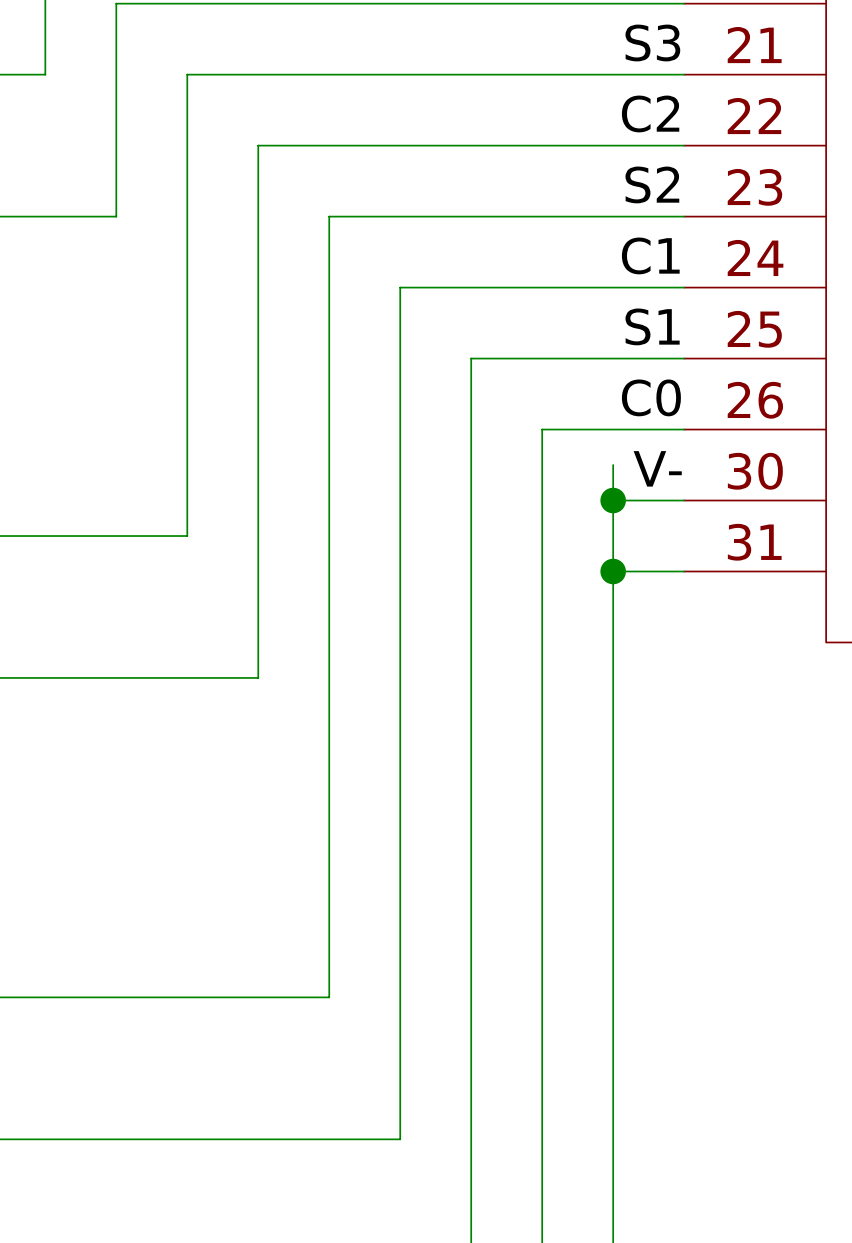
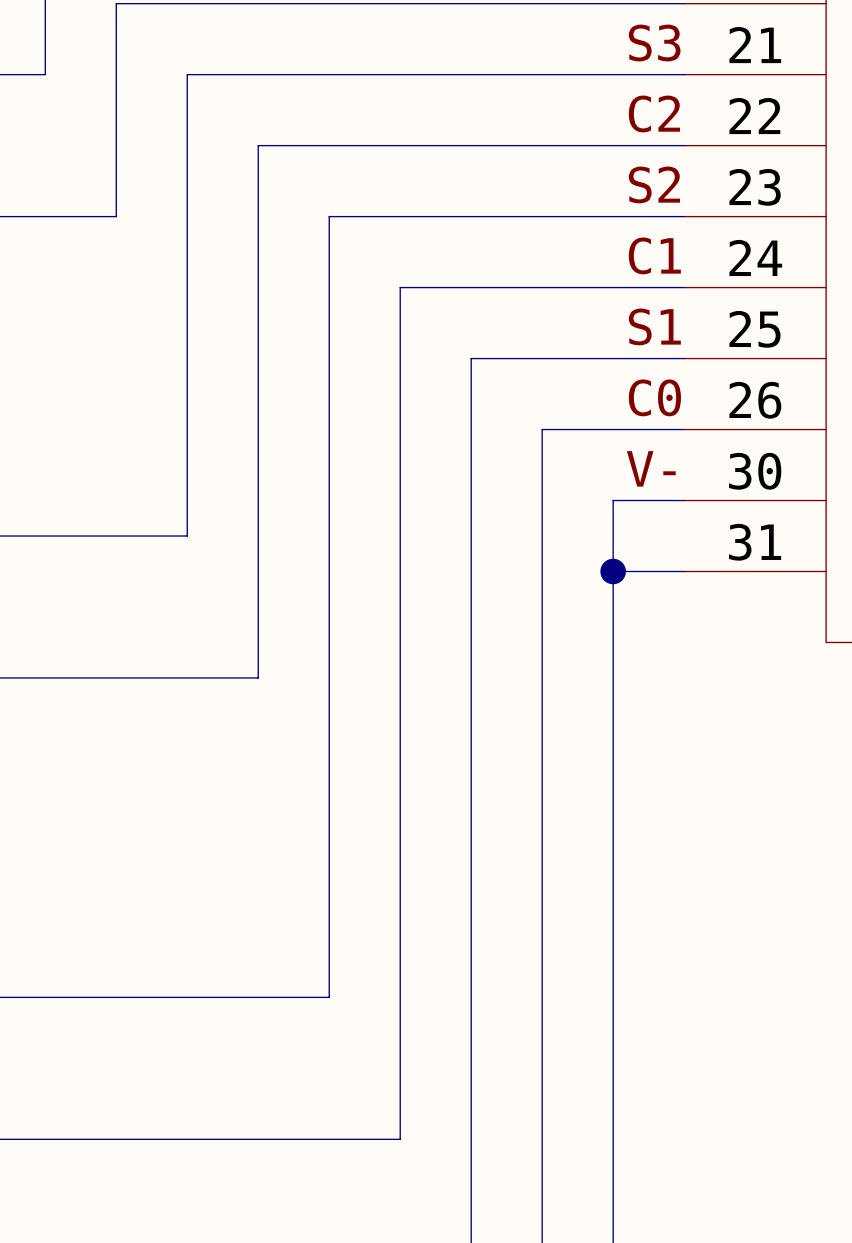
wire: (613, 465) (613, 500) -> none
junction: (613, 500) -> none

